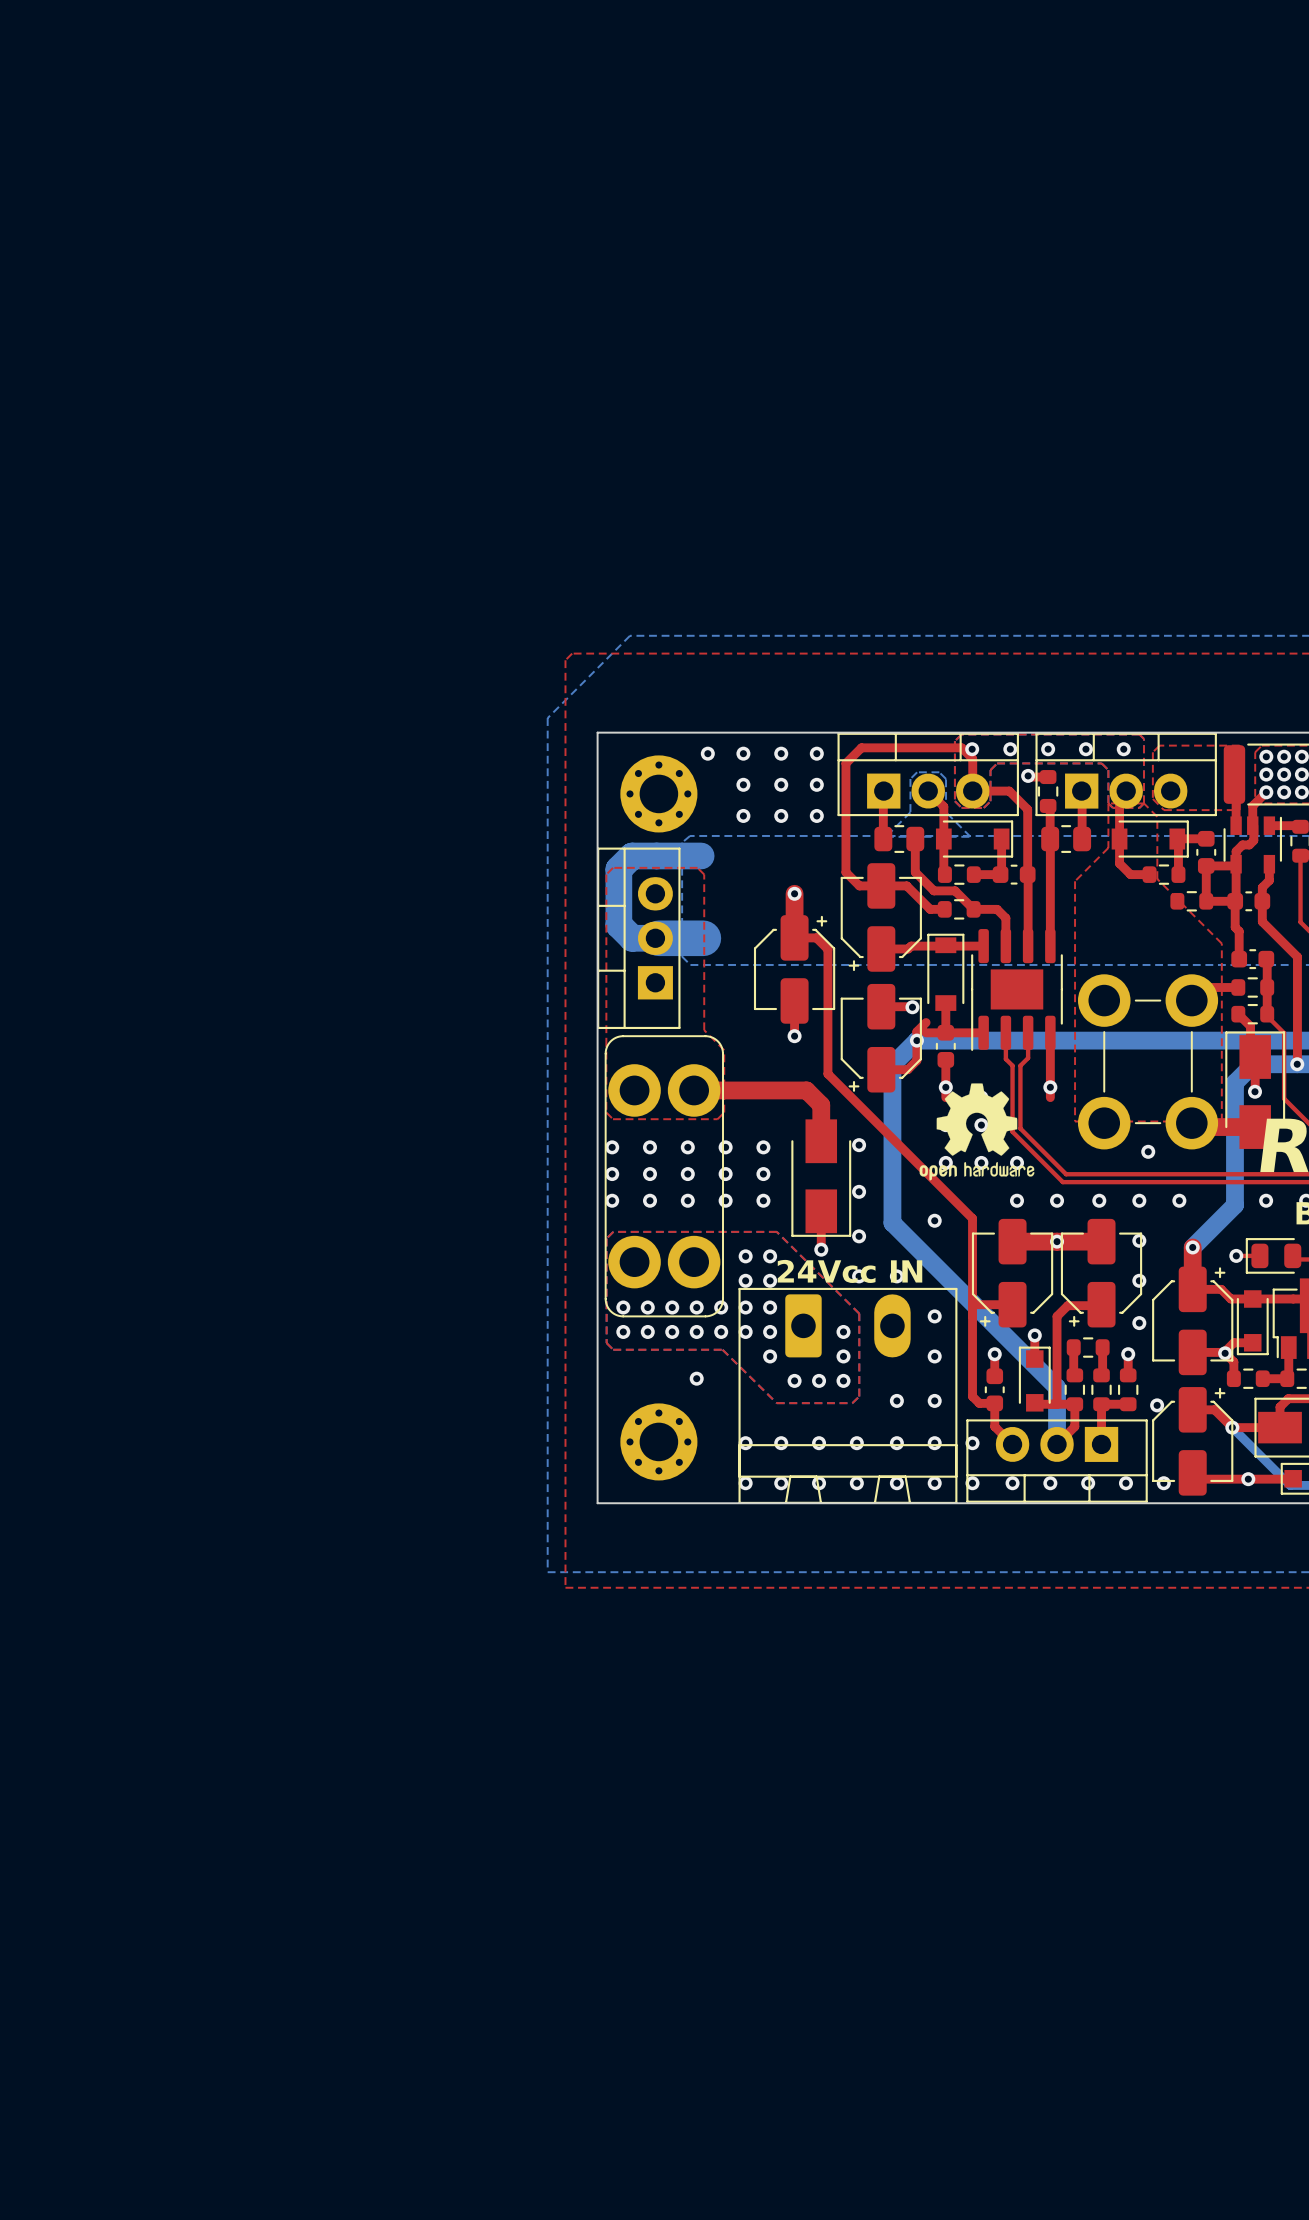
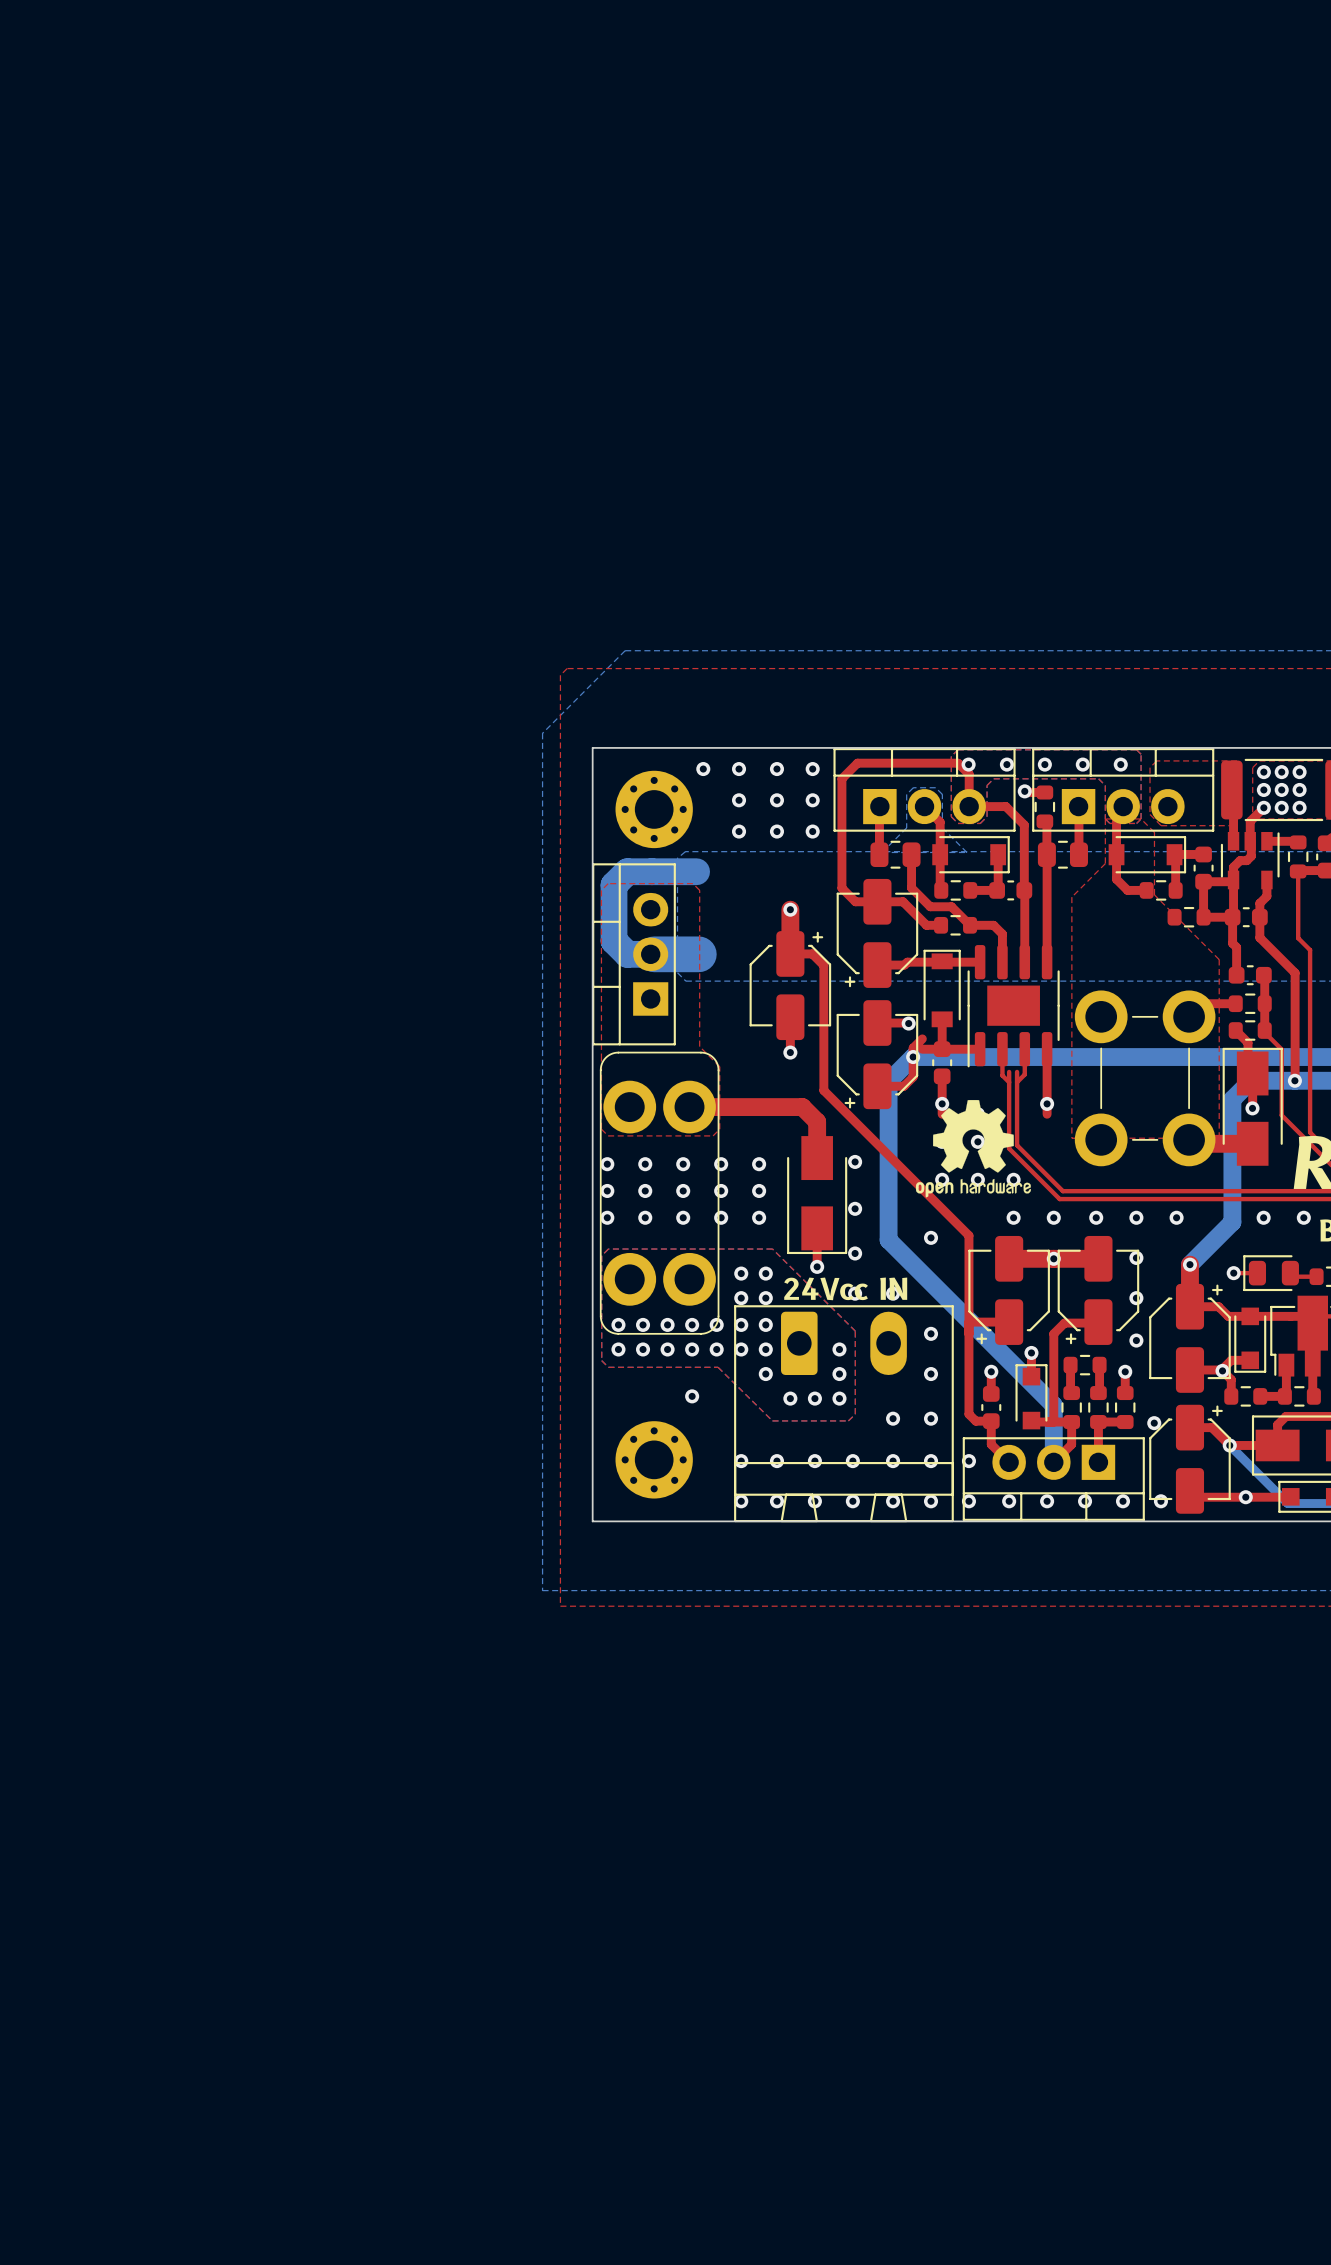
top track: none -> (1009, 1071) (1009, 1082)
top track: none -> (1017, 1071) (1017, 1082)
via: (1148, 1151) -> none

